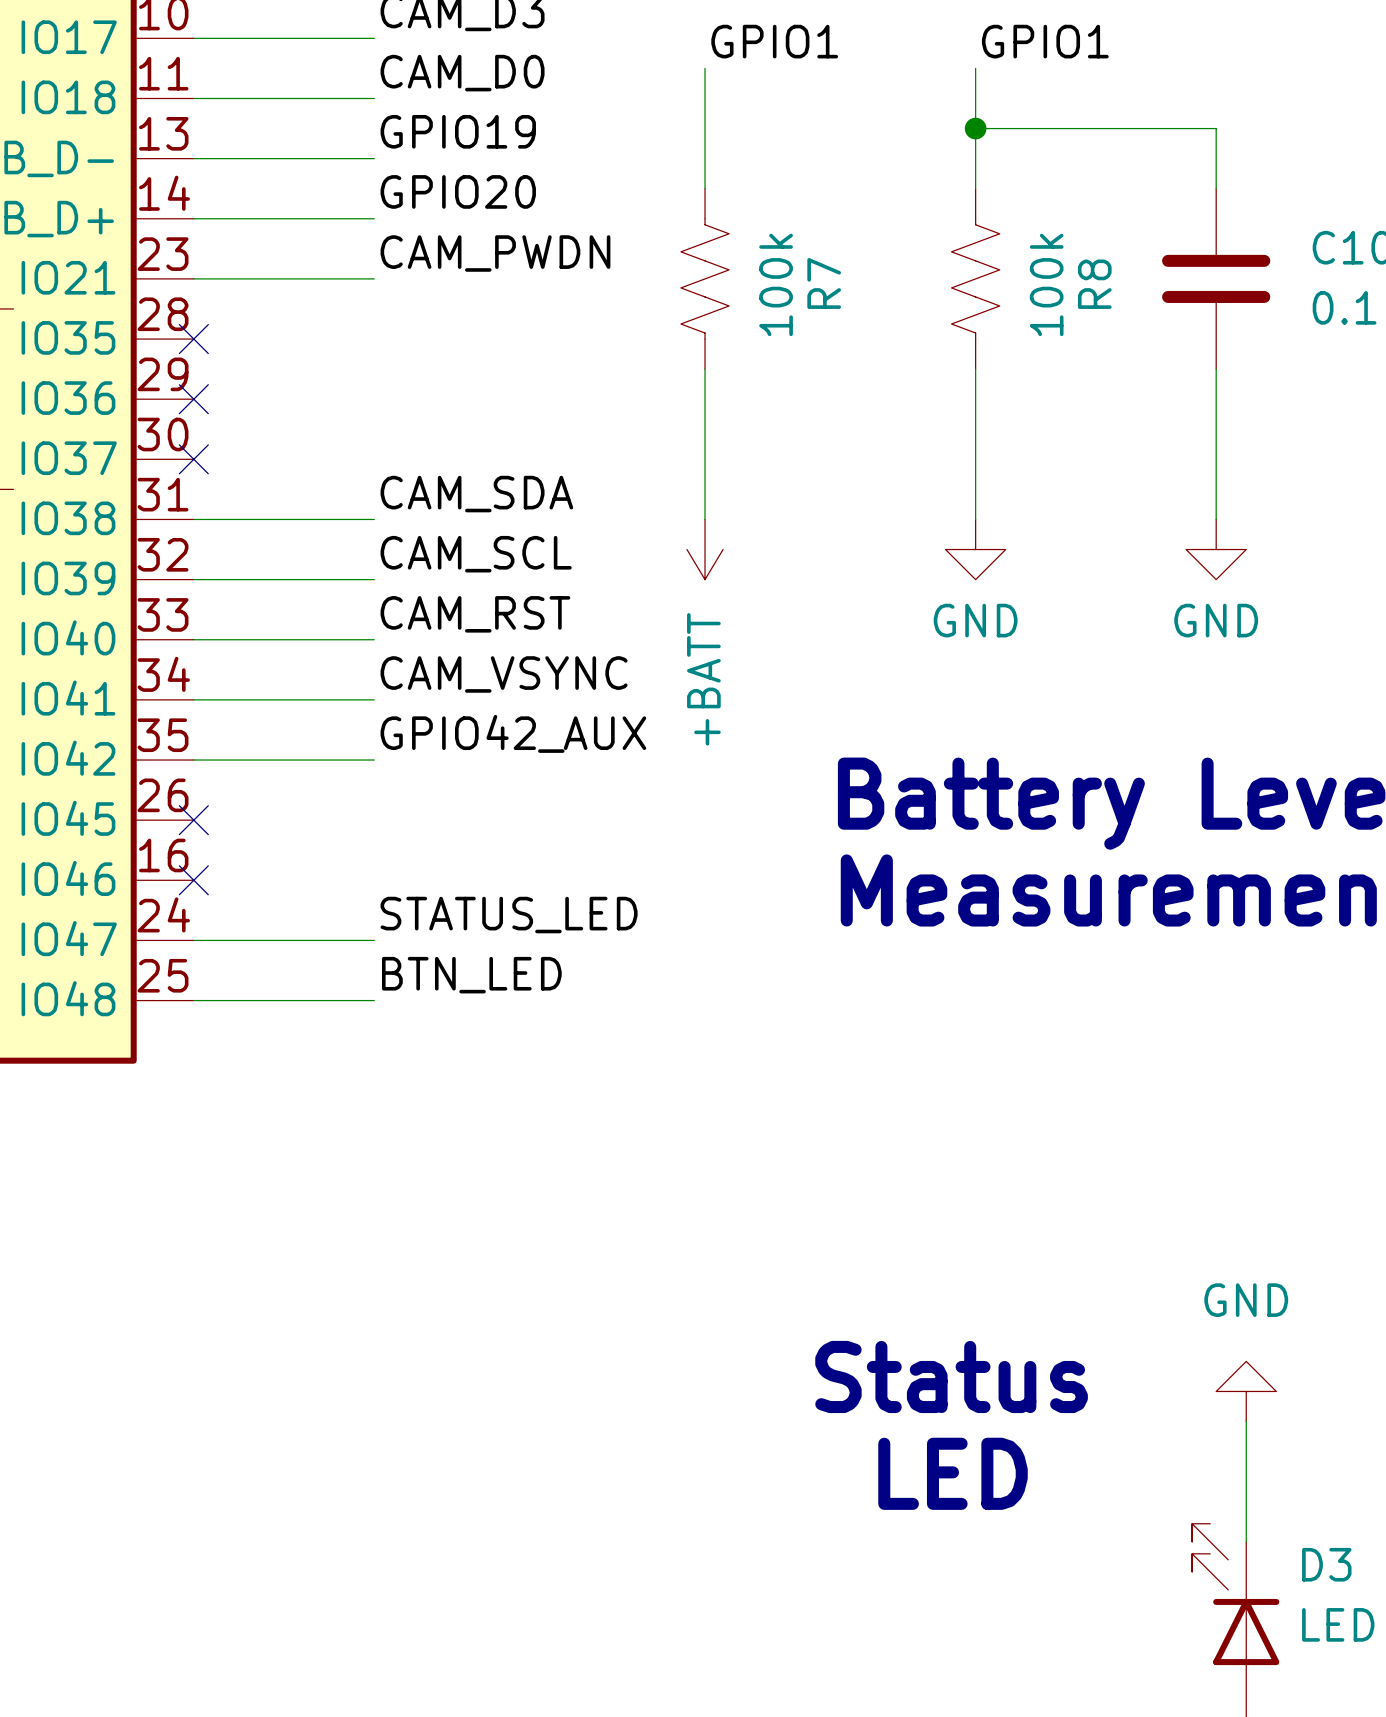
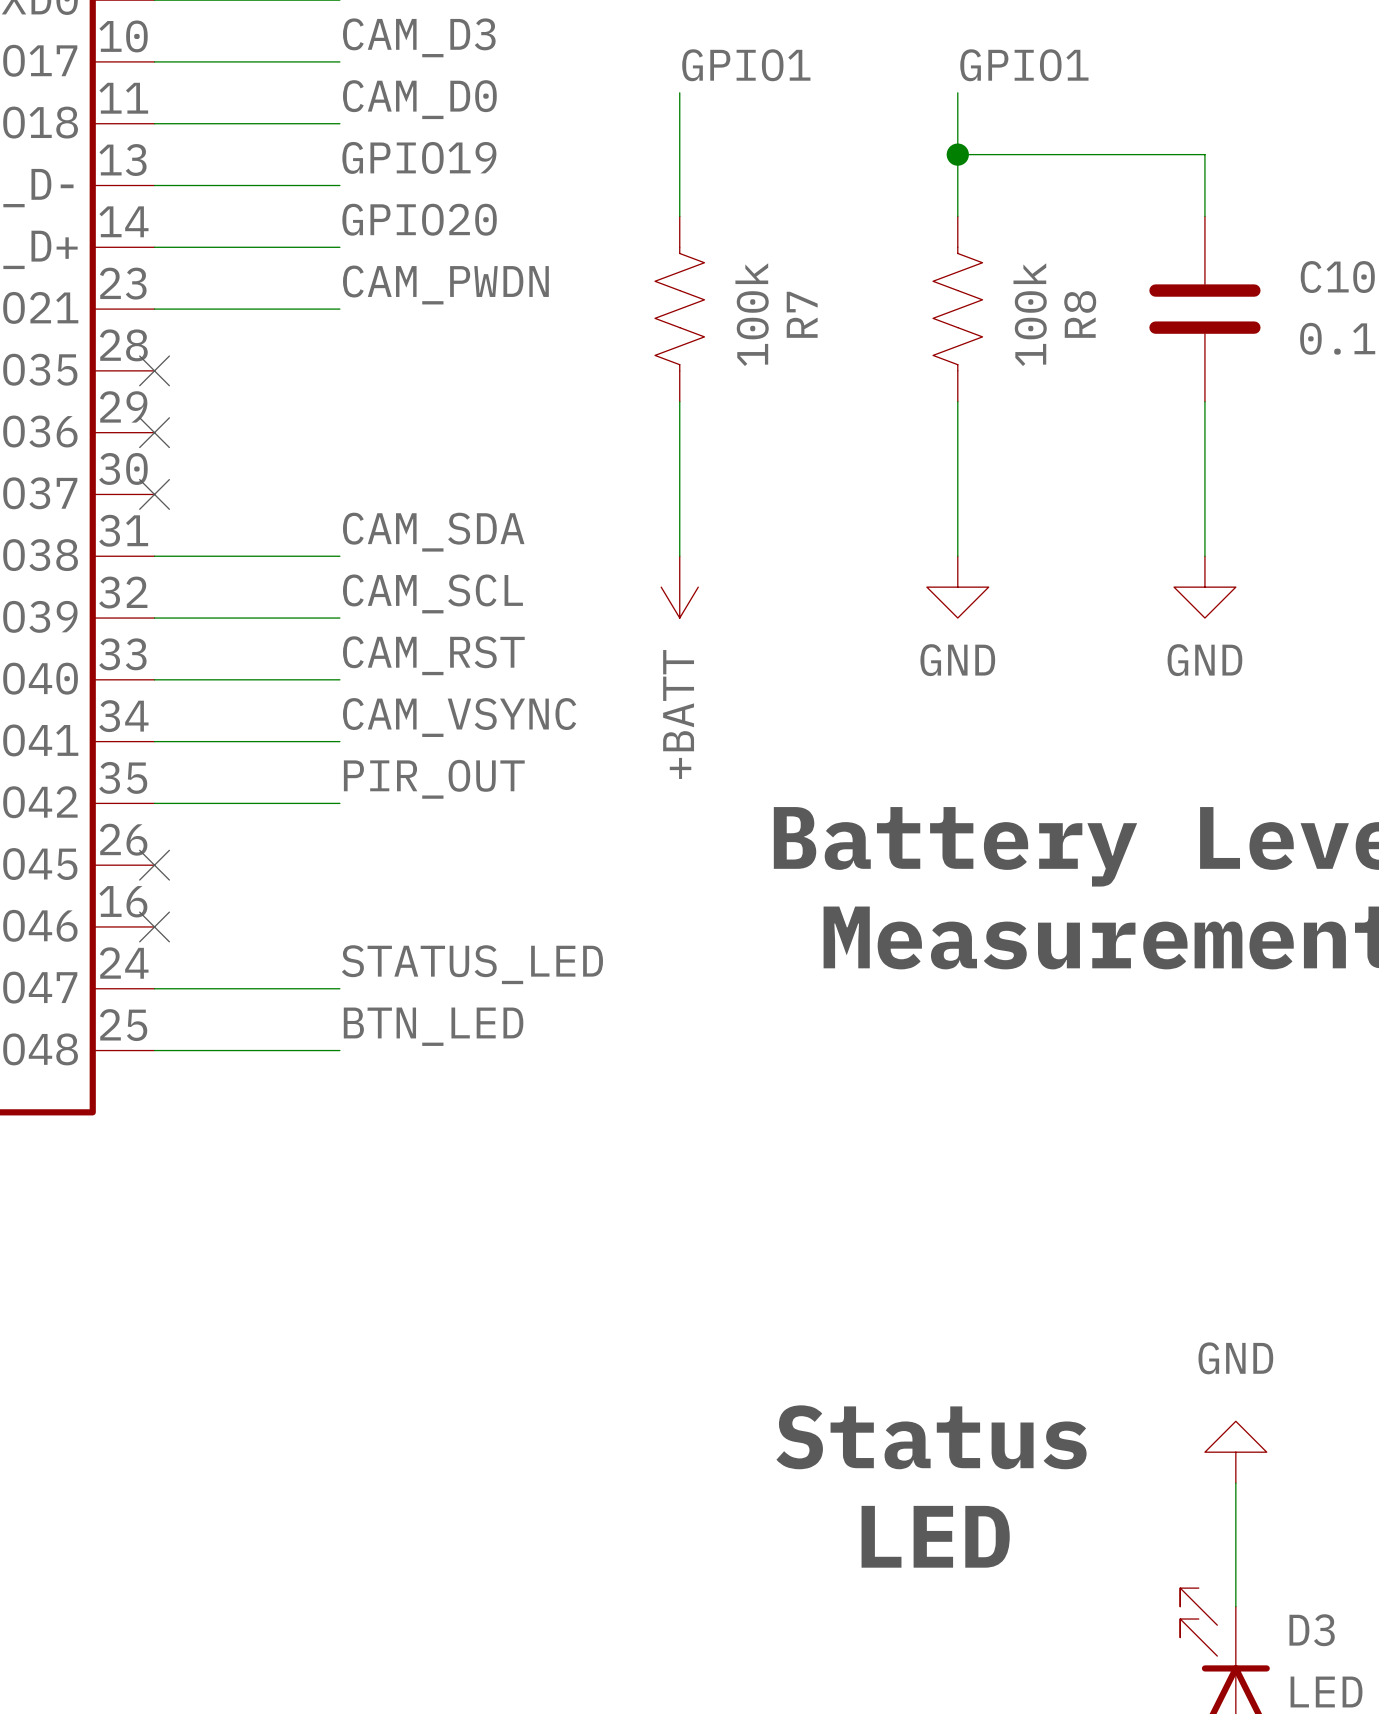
label: GPIO42_AUX (513, 733) -> PIR_OUT (434, 779)

